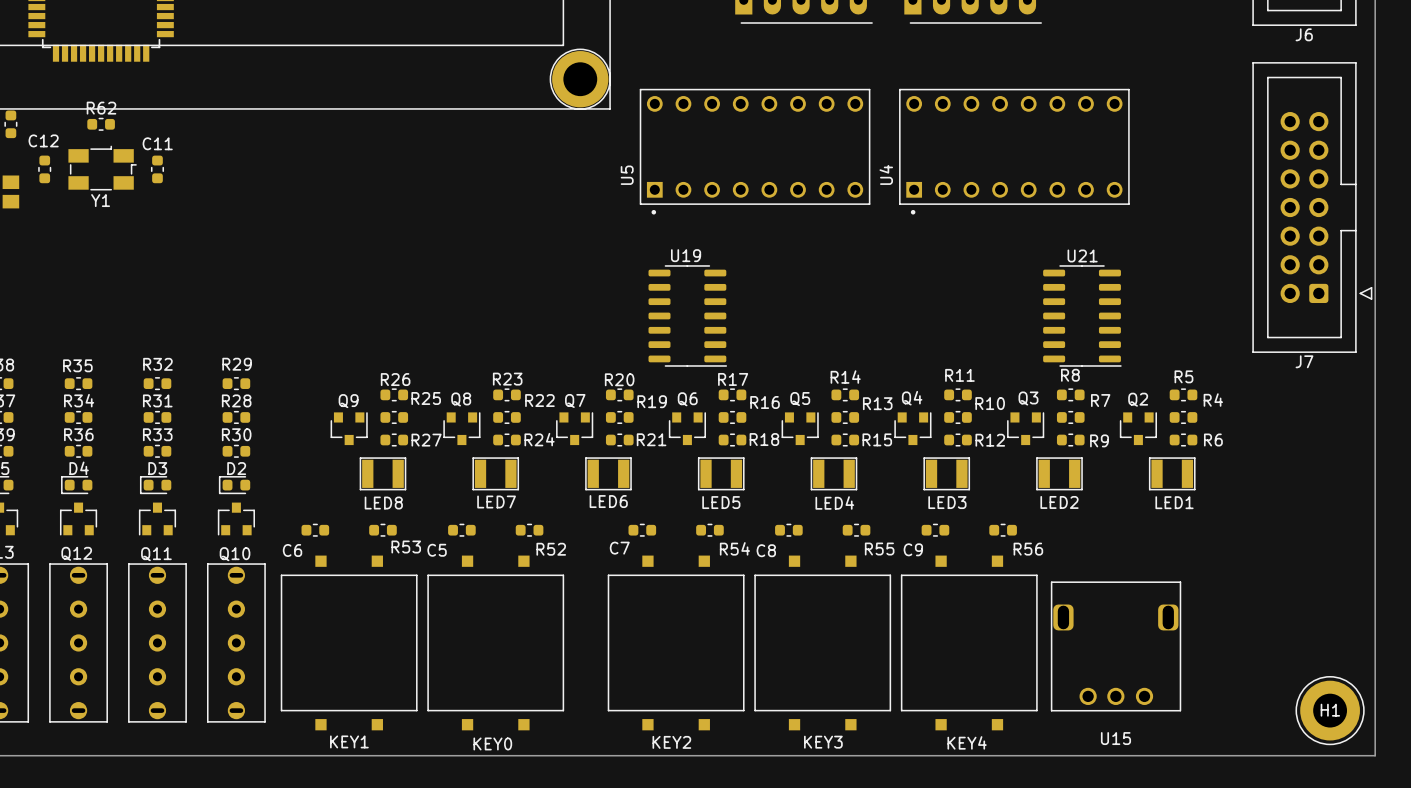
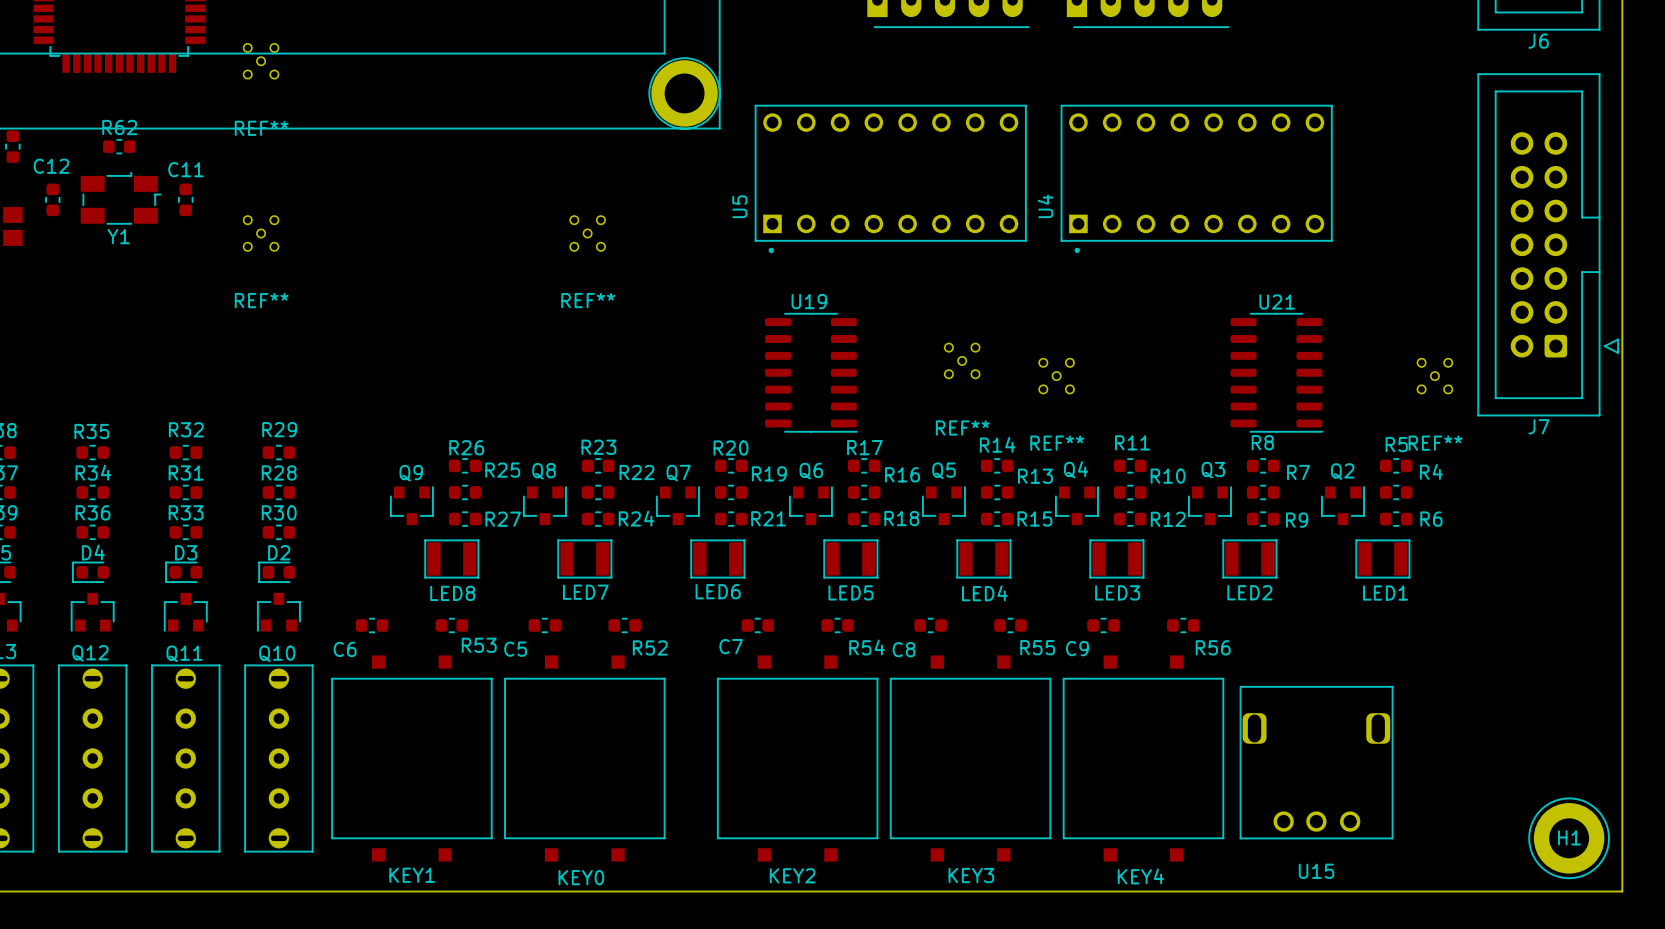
REF**: none -> (261, 61)
REF**: none -> (261, 233)
REF**: none -> (587, 233)
REF**: none -> (962, 360)
REF**: none -> (1056, 376)
REF**: none -> (1434, 376)

